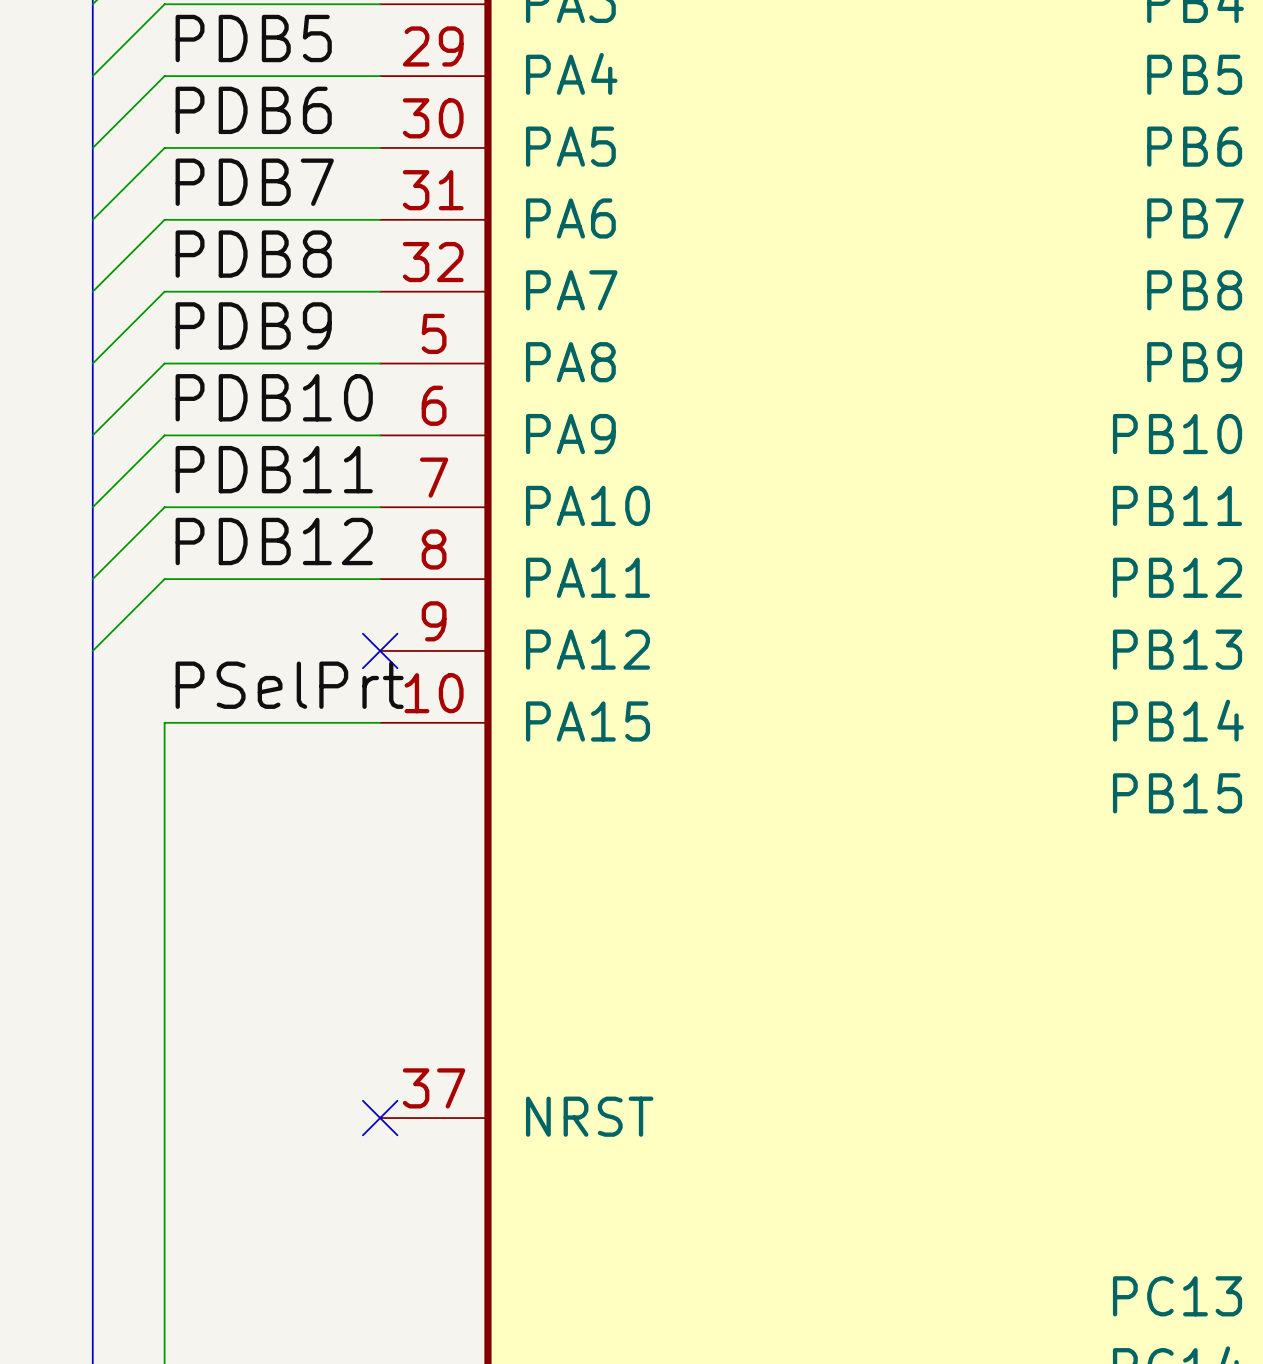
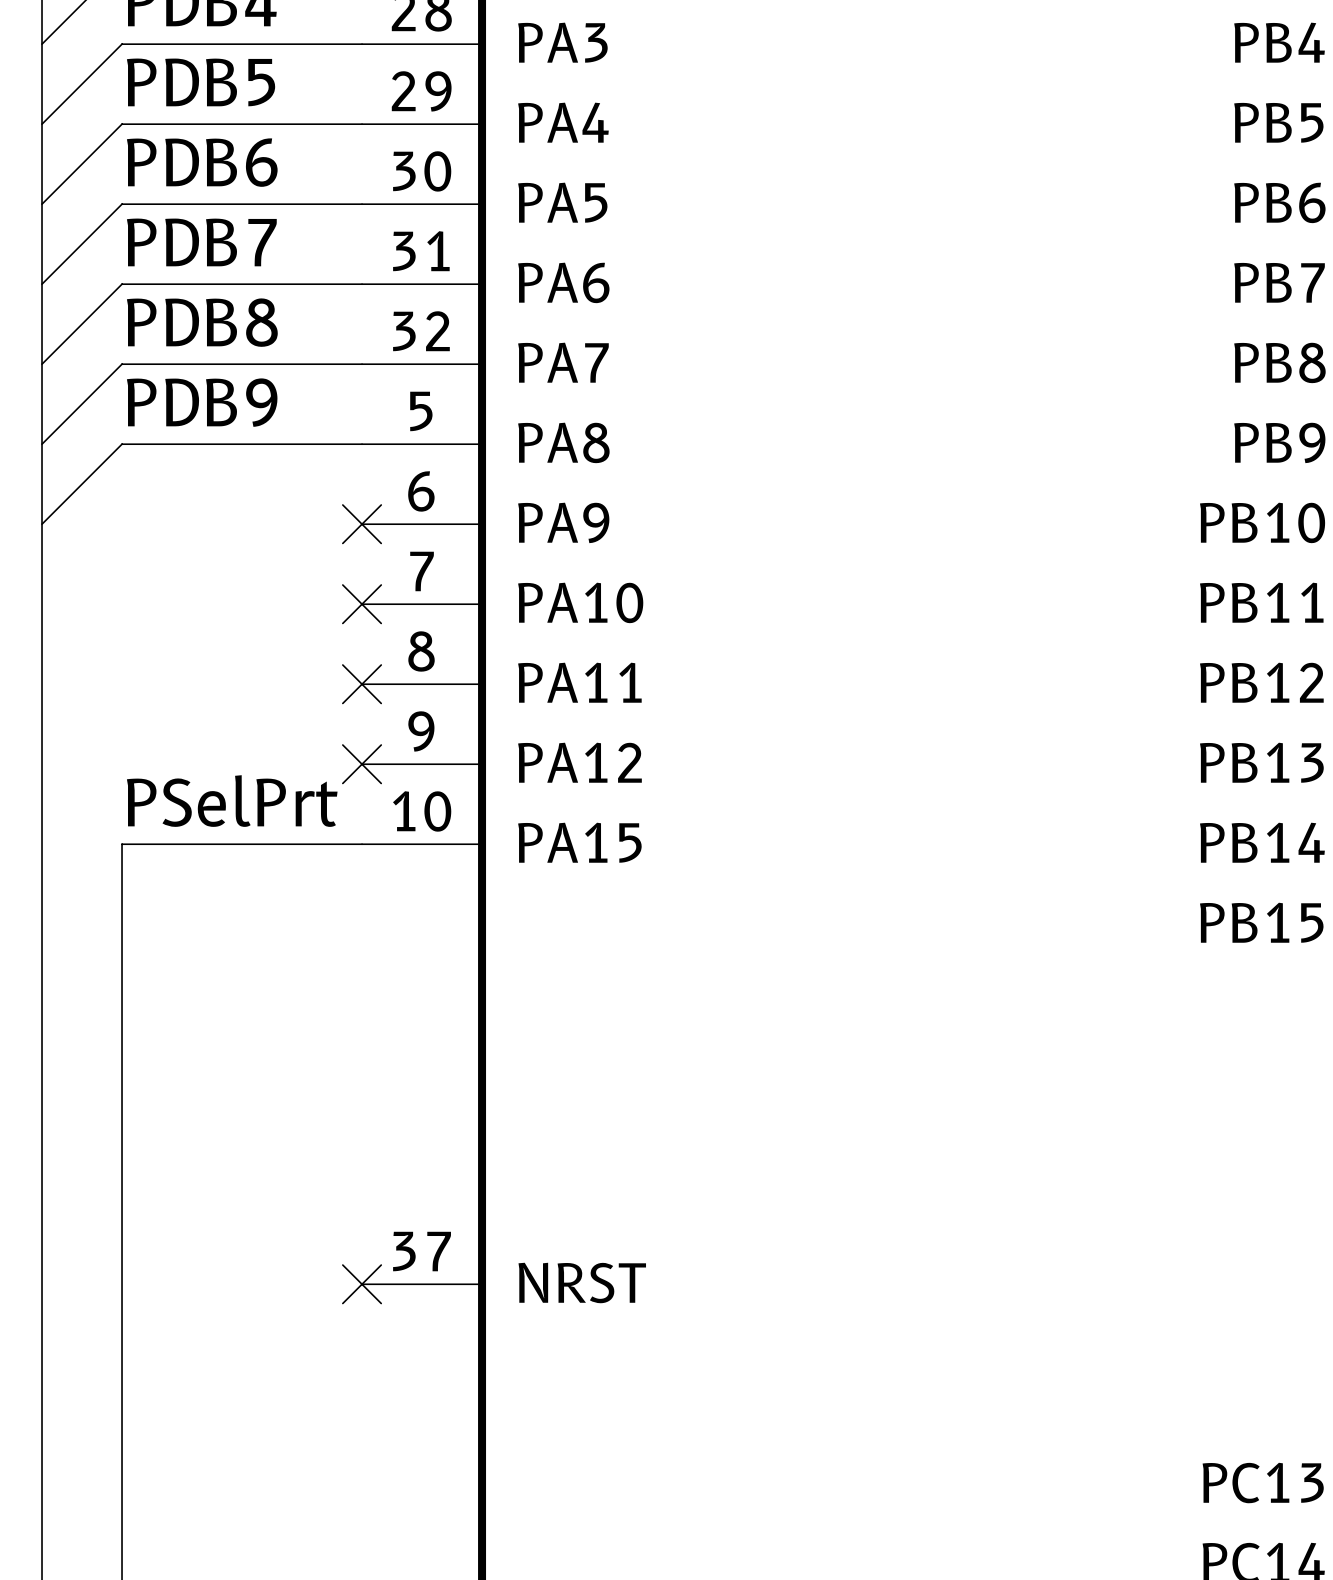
label: PDB10 (274, 397) -> none
wire: (380, 435) (164, 435) (92, 507) -> none
no-connect mark: none -> (362, 524)
label: PDB11 (274, 469) -> none
wire: (380, 507) (164, 507) (92, 579) -> none
no-connect mark: none -> (362, 604)
label: PDB12 (274, 541) -> none
wire: (380, 579) (164, 579) (92, 650) -> none
no-connect mark: none -> (362, 684)

